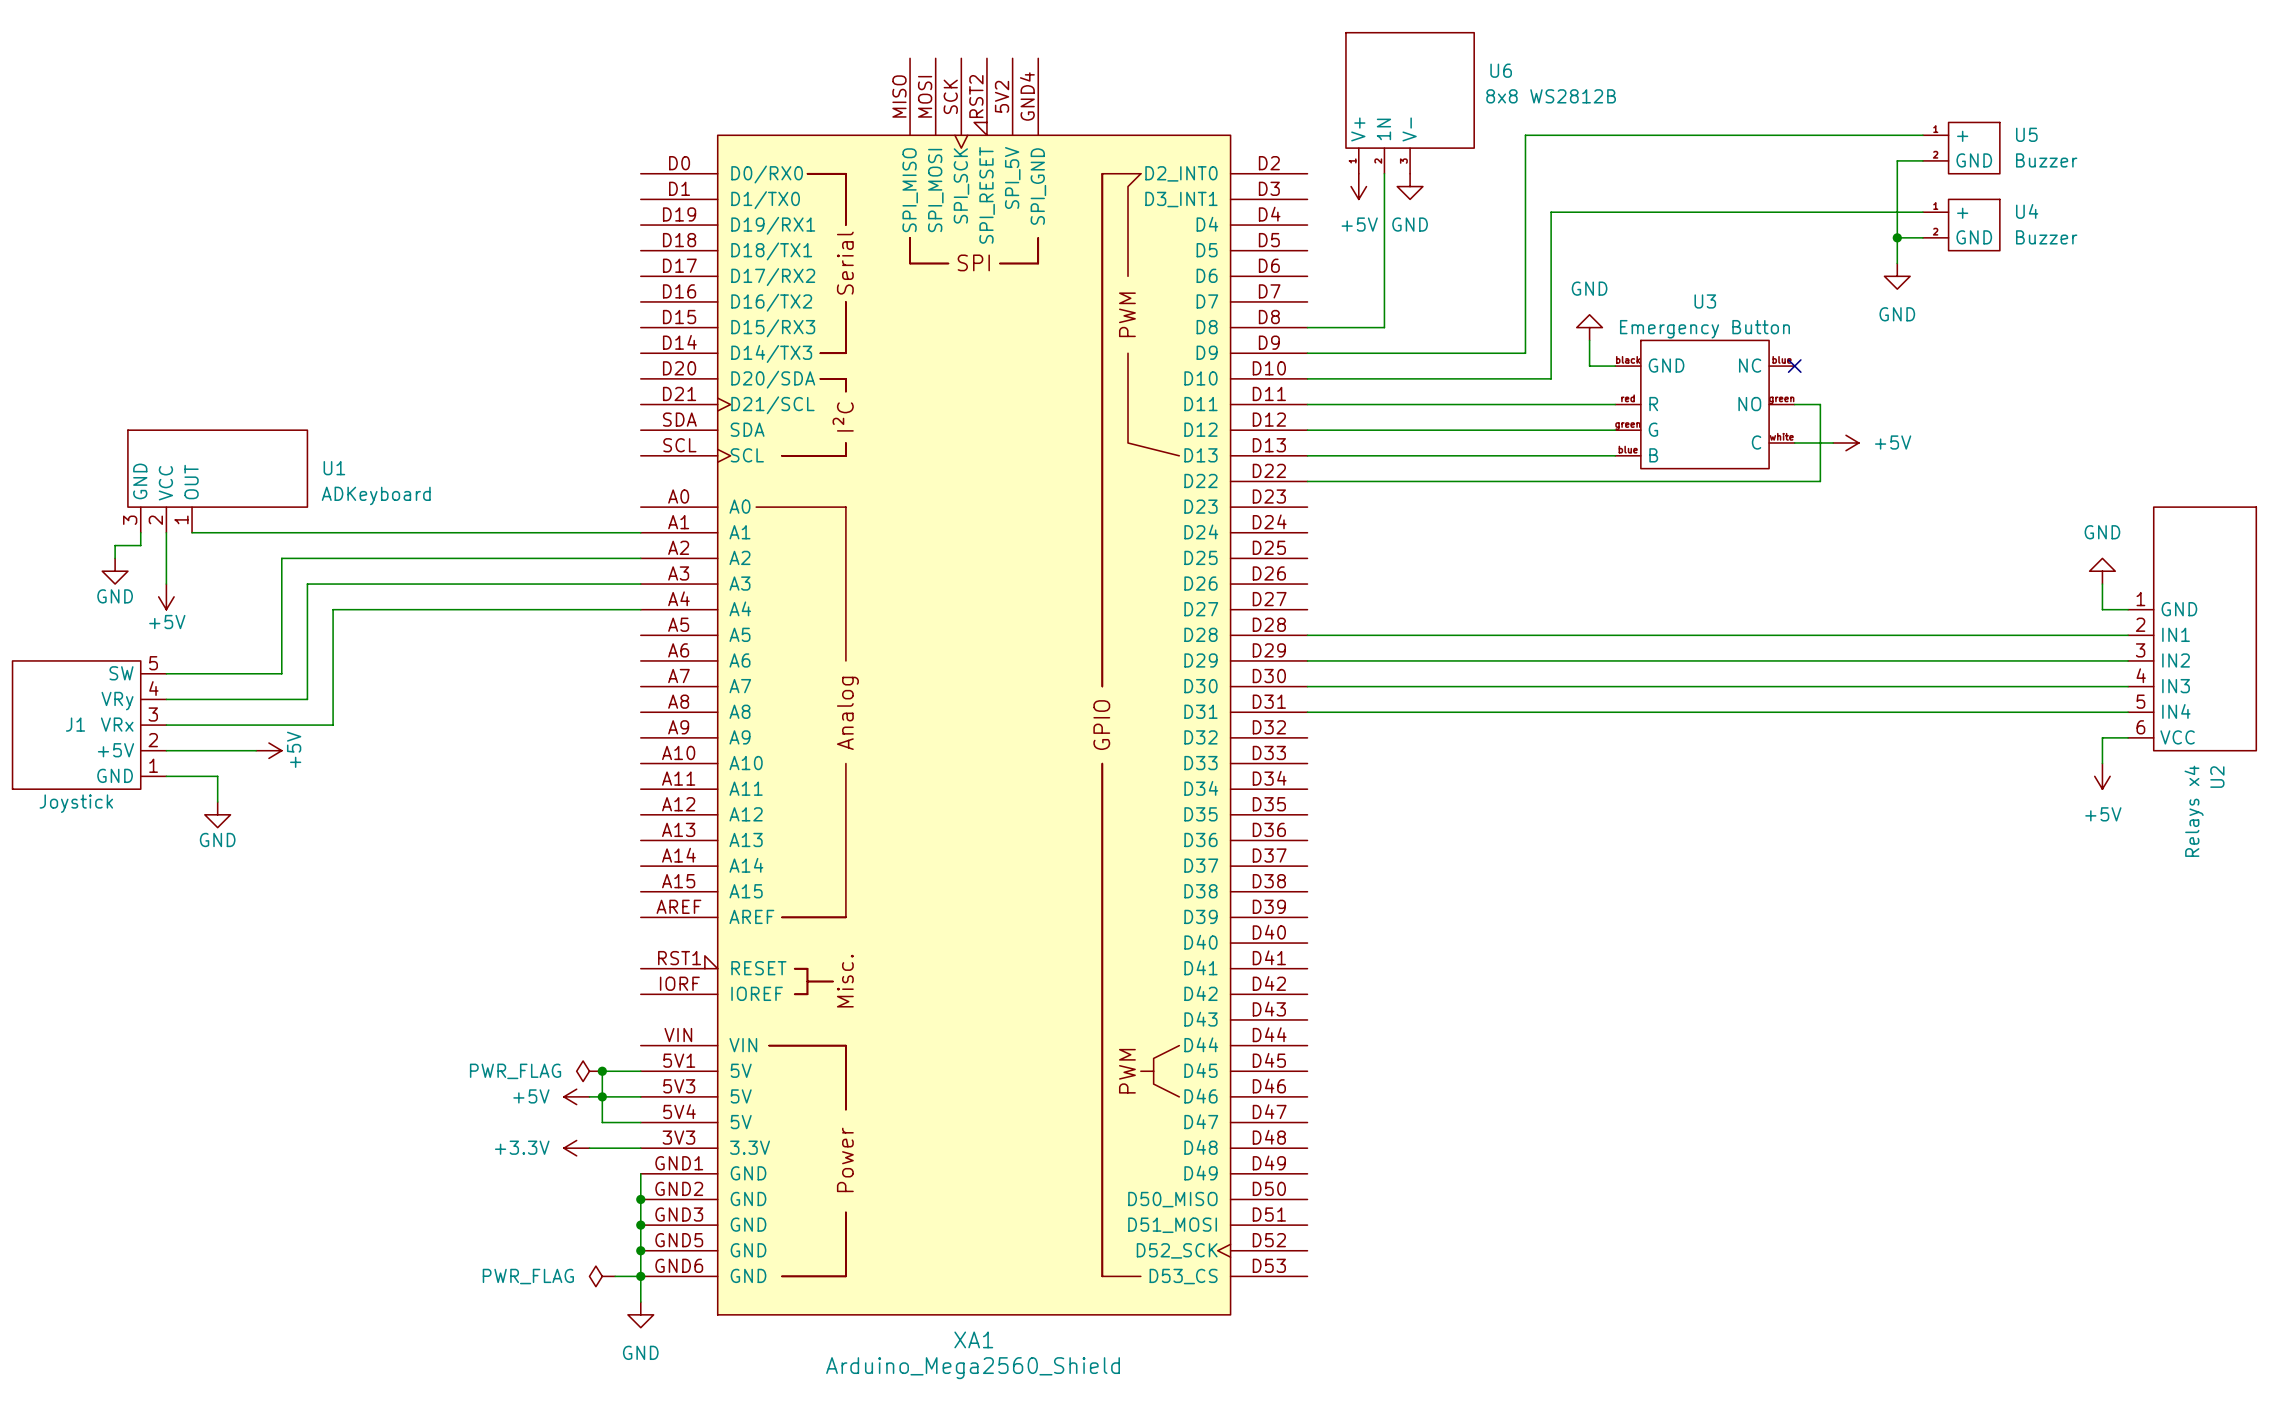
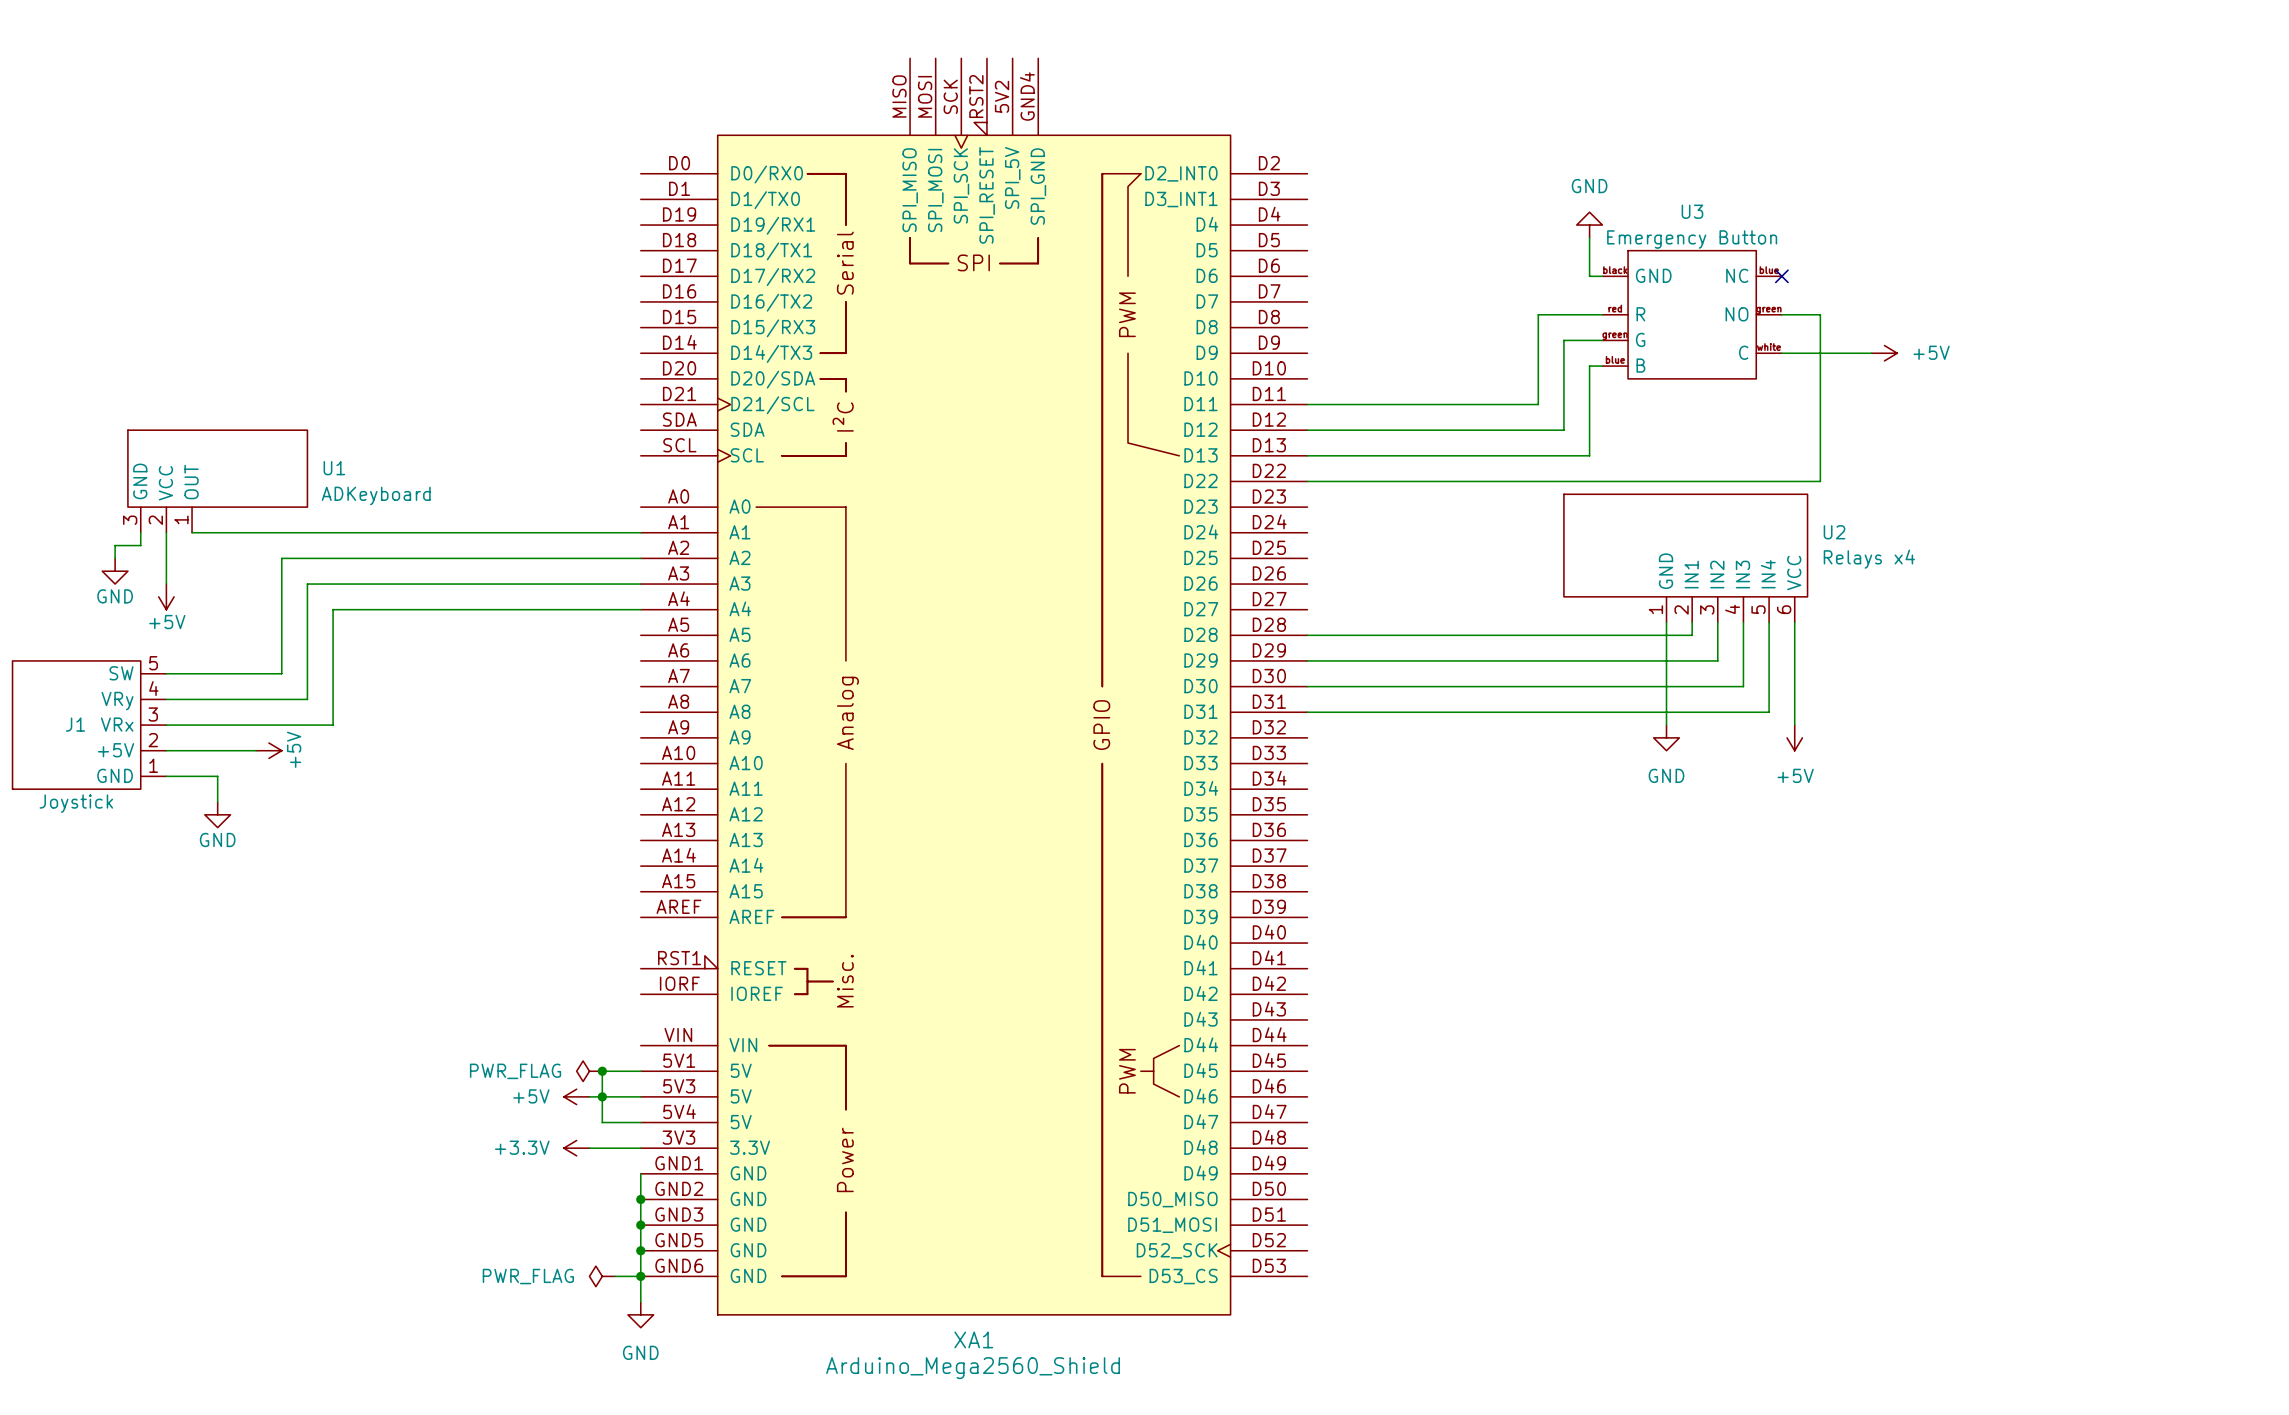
U6: 8x8 WS2812B (1410, 103) -> none
wire: (1922, 135) (1525, 135) (1525, 353) (1307, 353) -> none
U5: Buzzer (1961, 148) -> none
wire: (1922, 160) (1897, 160) (1897, 263) -> none
wire: (1384, 173) (1384, 327) (1307, 327) -> none
power symbol: +5V (1358, 186) -> none
power symbol: GND (1410, 186) -> none
wire: (1922, 212) (1551, 212) (1551, 378) (1307, 378) -> none
power symbol: none -> GND (1589, 225)
U4: Buzzer (1961, 225) -> none
wire: none -> (1589, 237) (1589, 276) (1602, 276)
wire: (1897, 237) (1922, 237) -> none
junction: (1897, 237) -> none
no-connect mark: none -> (1781, 276)
power symbol: GND (1897, 276) -> none
power symbol: GND (1589, 327) -> none
wire: (1589, 340) (1589, 366) -> none
wire: none -> (1781, 353) (1871, 353)
no-connect mark: (1794, 366) -> none
wire: (1538, 404) (1615, 404) -> (1538, 404) (1538, 314) (1602, 314)
U3 position: (1704, 404) -> (1692, 314)
wire: (1794, 404) (1820, 404) -> (1781, 314) (1820, 314) (1820, 404)
wire: (1563, 430) (1615, 430) -> (1563, 430) (1563, 340) (1602, 340)
wire: (1794, 443) (1833, 443) -> none
power symbol position: +5V (1846, 443) -> +5V (1884, 353)
wire: (1589, 455) (1615, 455) -> (1589, 455) (1589, 366)
power symbol: GND (2102, 571) -> none
wire: (2102, 584) (2102, 609) (2128, 609) -> none
wire: none -> (1666, 622) (1666, 725)
wire: none -> (1794, 622) (1794, 725)
U2 position: (2192, 628) -> (1685, 558)
U2 rotation: 0° (2205, 628) -> 90° counterclockwise (1685, 545)
wire: (1692, 635) (2128, 635) -> (1692, 635) (1692, 622)
wire: (1717, 660) (2128, 660) -> (1717, 660) (1717, 622)
wire: (1743, 686) (2128, 686) -> (1743, 686) (1743, 622)
wire: (1769, 712) (2128, 712) -> (1769, 712) (1769, 622)
power symbol: none -> GND (1666, 737)
power symbol: none -> +5V (1794, 737)
wire: (2128, 737) (2102, 737) (2102, 763) -> none
power symbol: +5V (2102, 776) -> none

